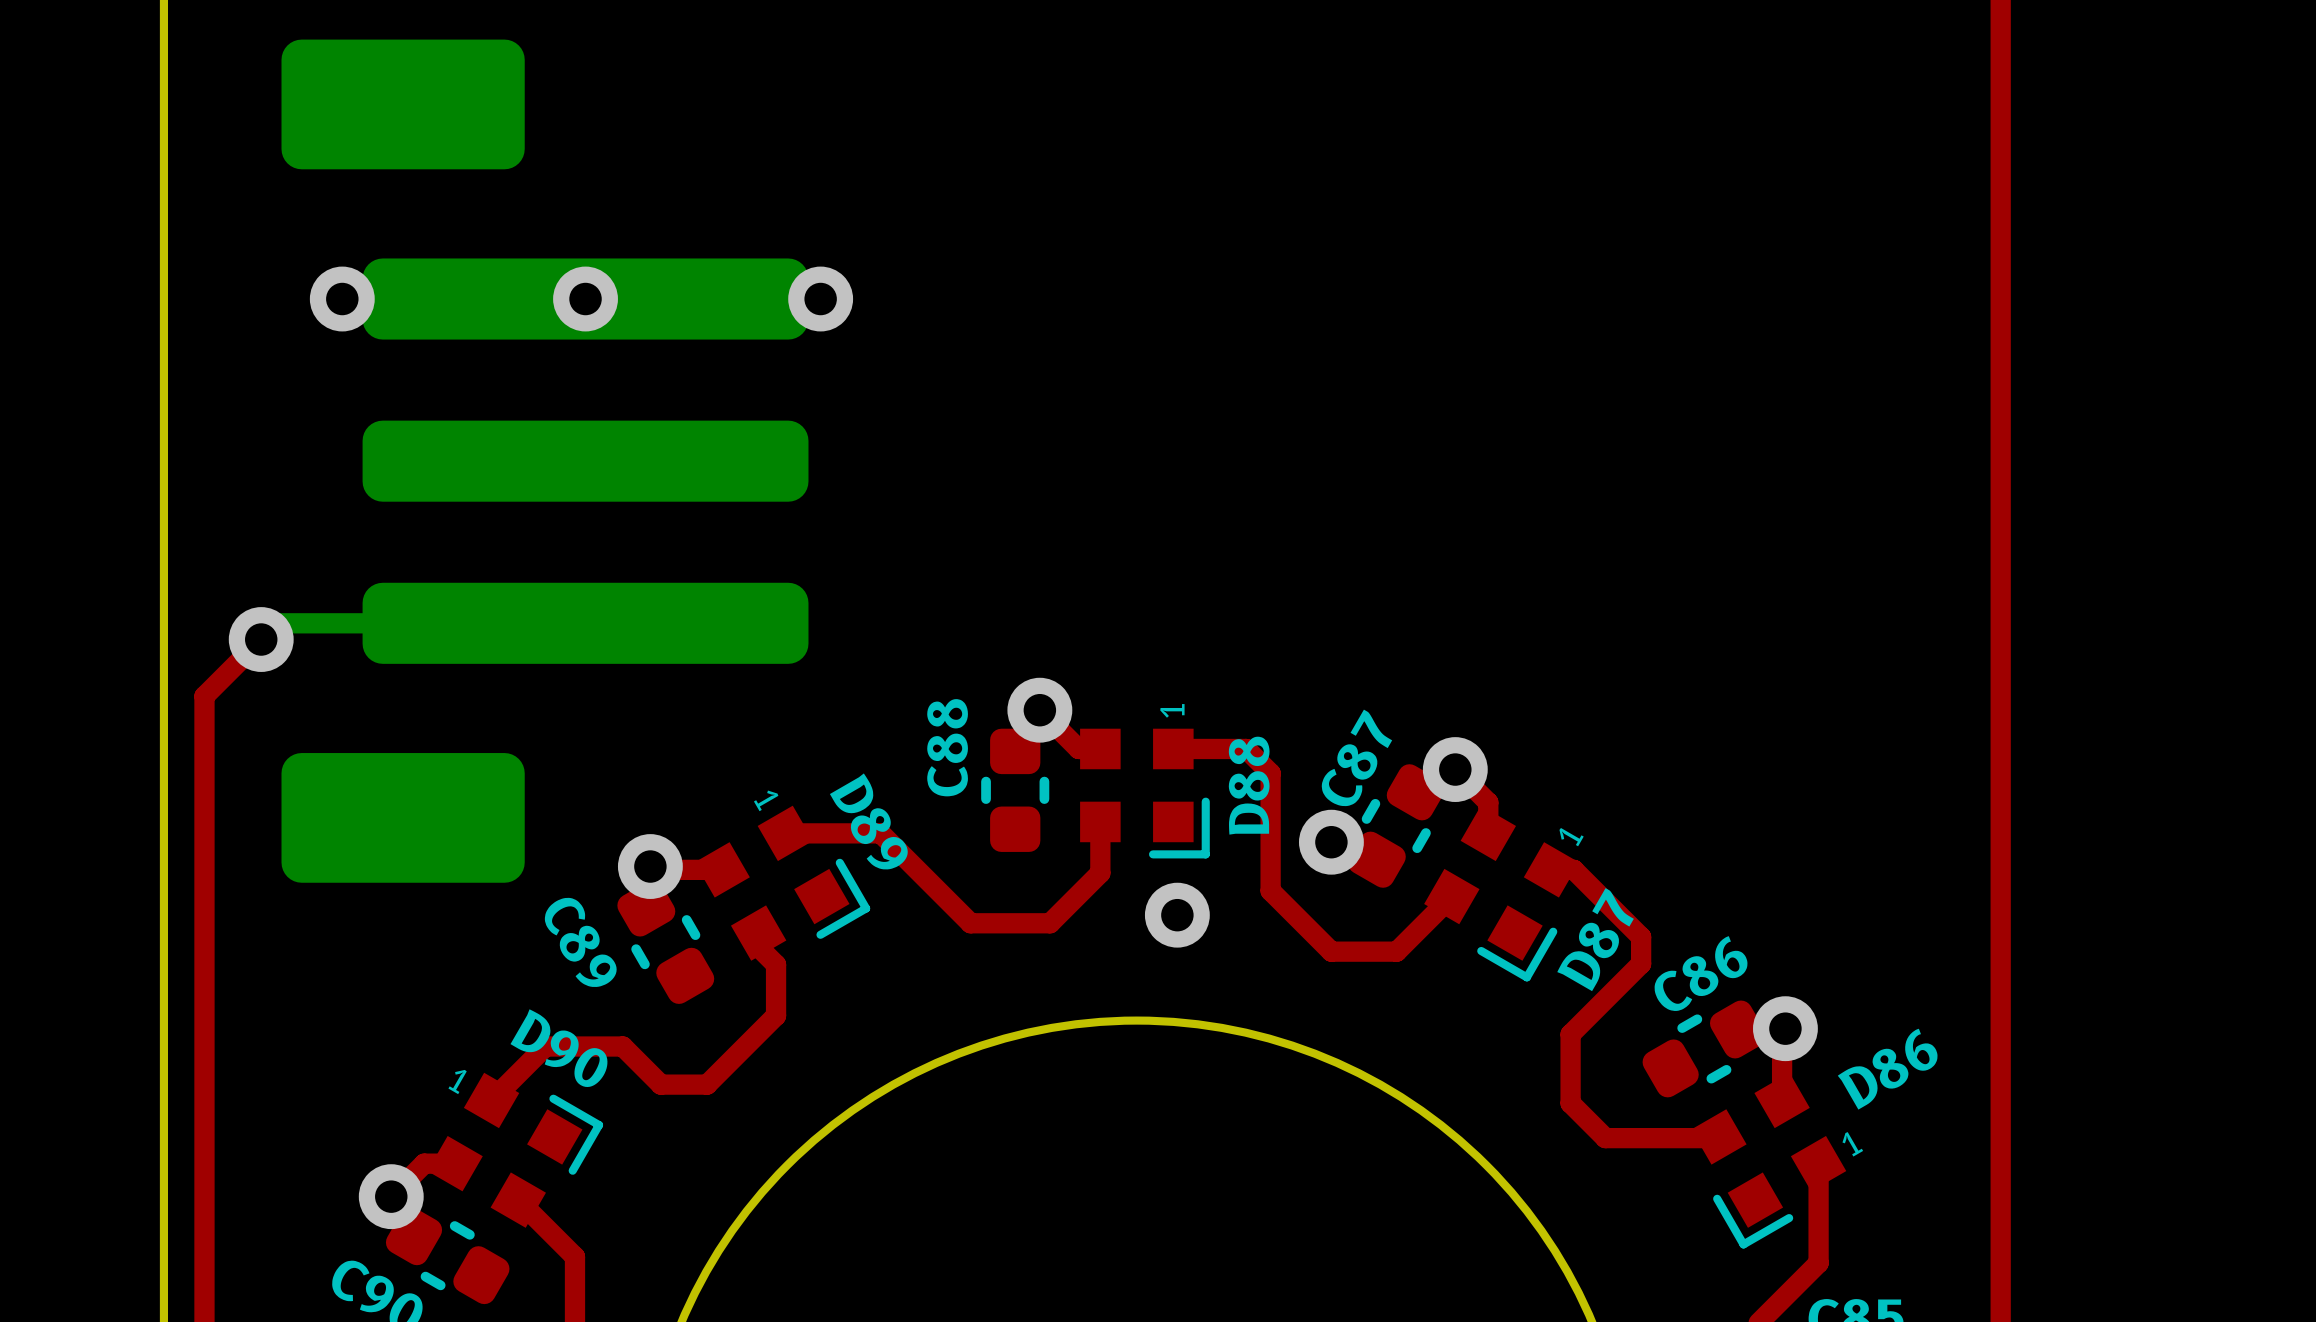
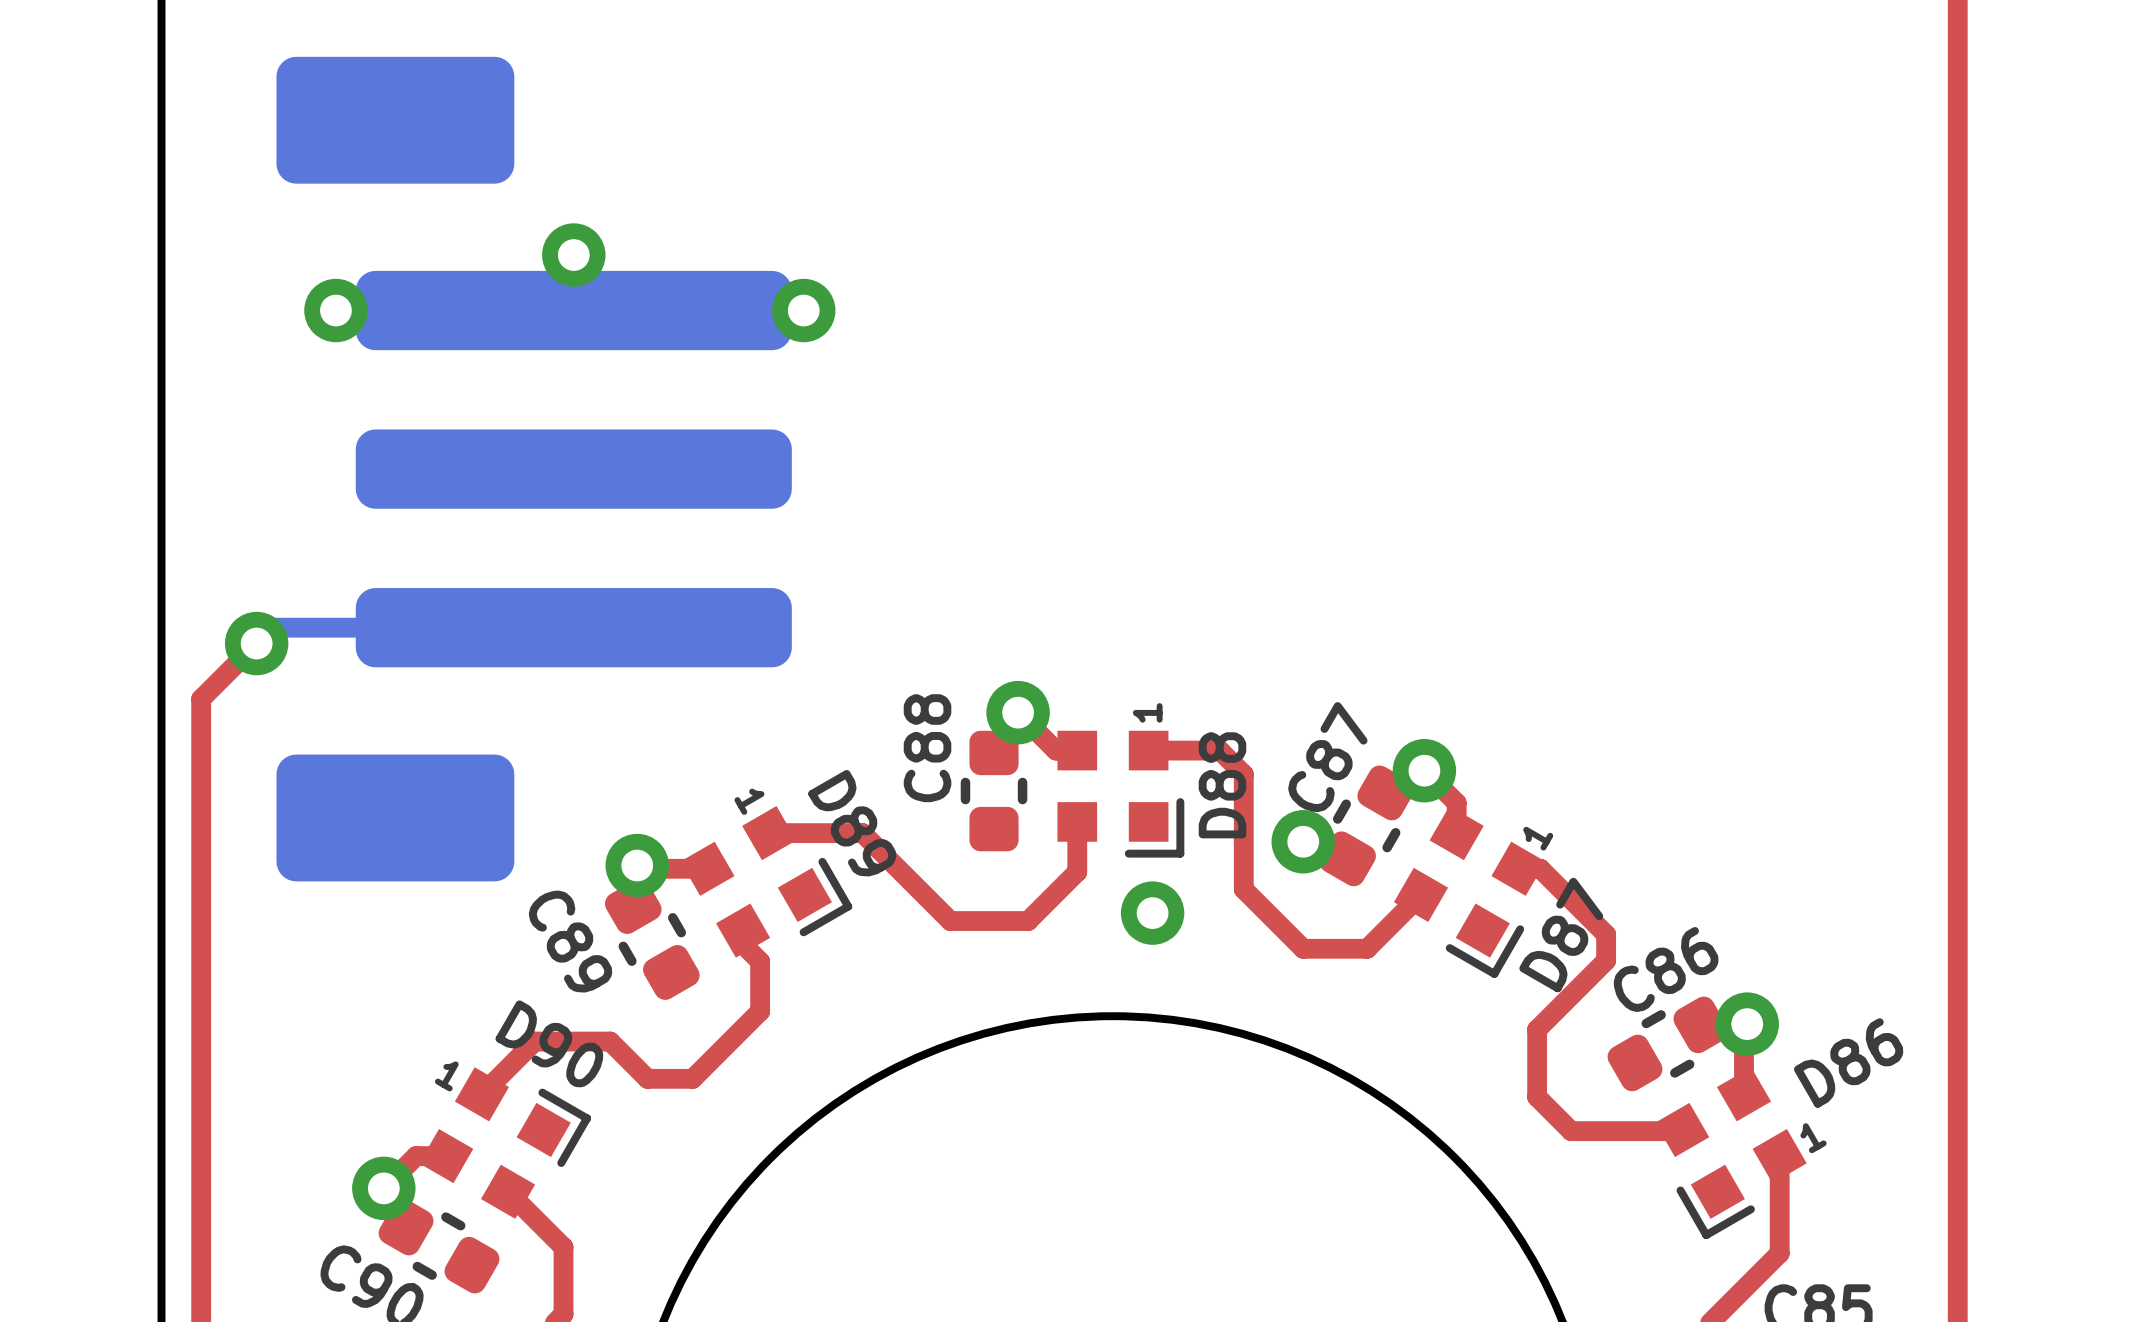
via position: (585, 299) -> (573, 255)

